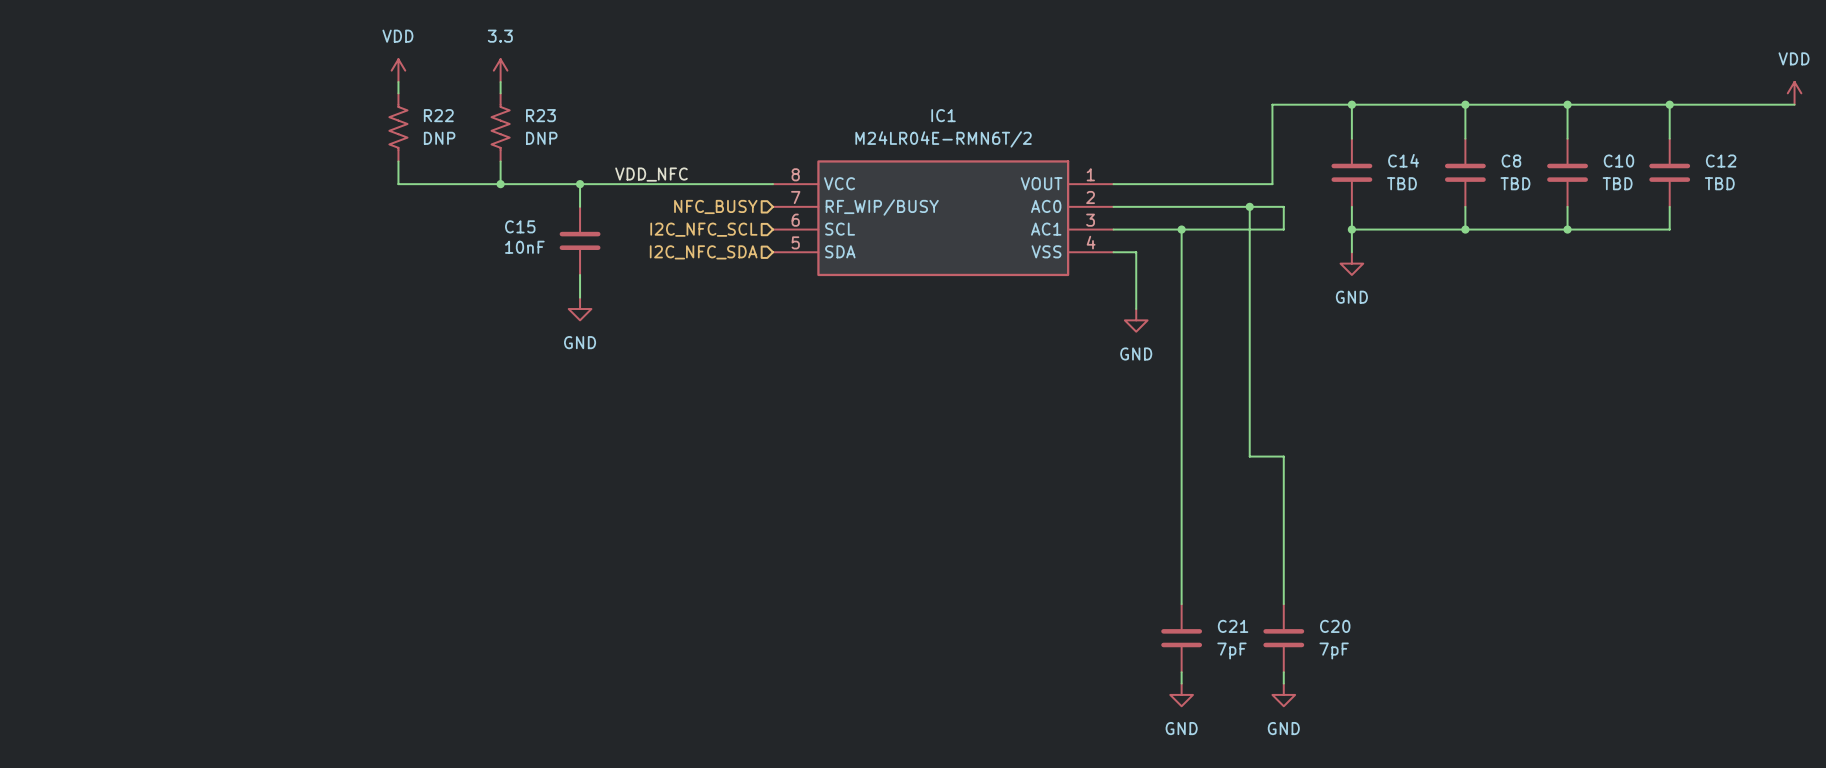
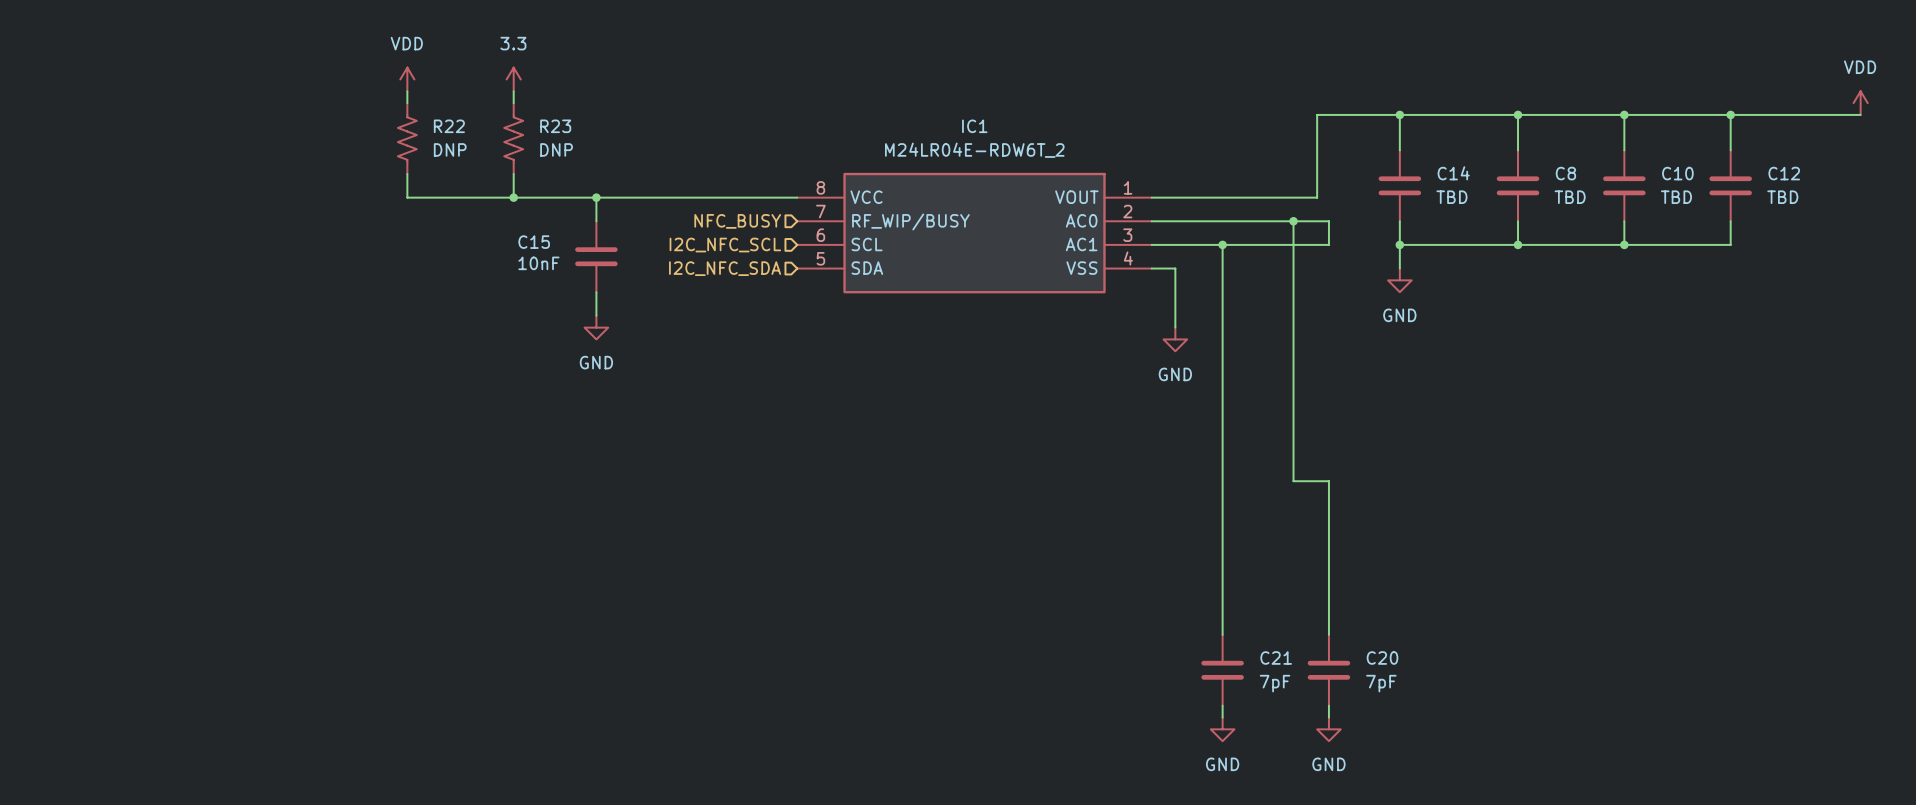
IC1 value: M24LR04E-RMN6T/2 (943, 139) -> M24LR04E-RDW6T_2 (974, 150)
label: VDD_NFC (651, 174) -> none

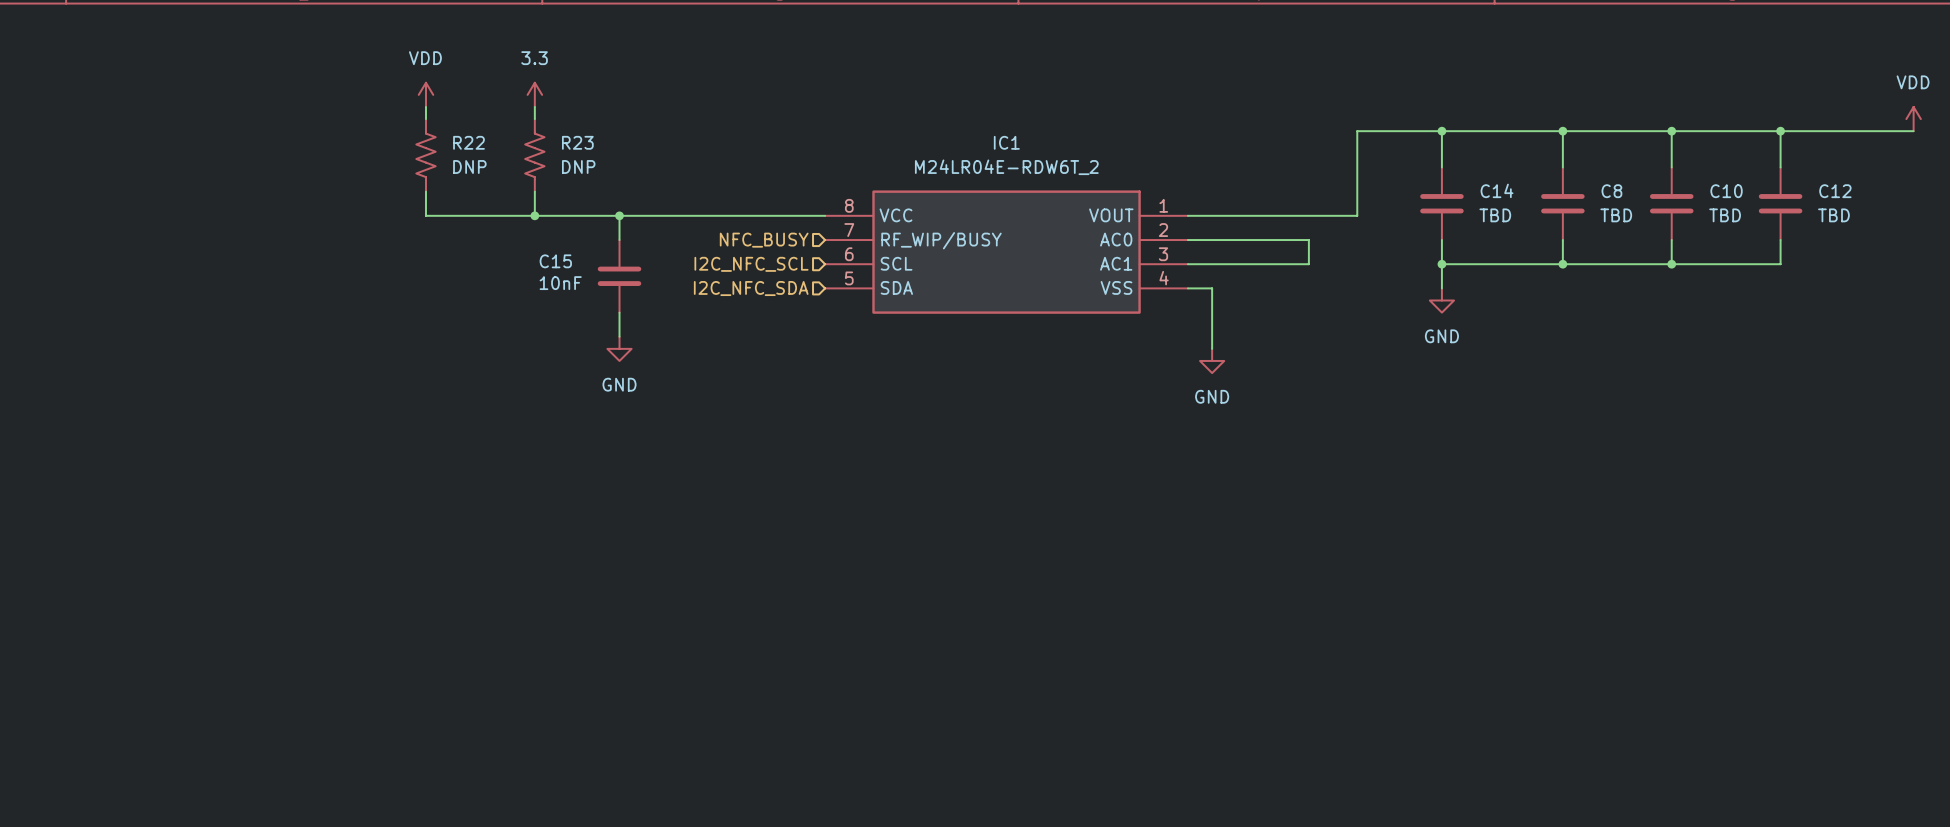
wire: (1269, 221) (1328, 221) (1328, 244) (1269, 244) -> (1308, 240) (1308, 264)
wire: (1293, 221) (1293, 481) (1328, 481) (1328, 634) -> none
junction: (1293, 221) -> none
wire: (1222, 244) (1222, 634) -> none
junction: (1222, 244) -> none
C21: 7pF (1222, 670) -> none
C20: 7pF (1328, 670) -> none
wire: (1222, 705) (1222, 717) -> none
wire: (1328, 705) (1328, 717) -> none
power symbol: GND (1222, 729) -> none
power symbol: GND (1328, 729) -> none

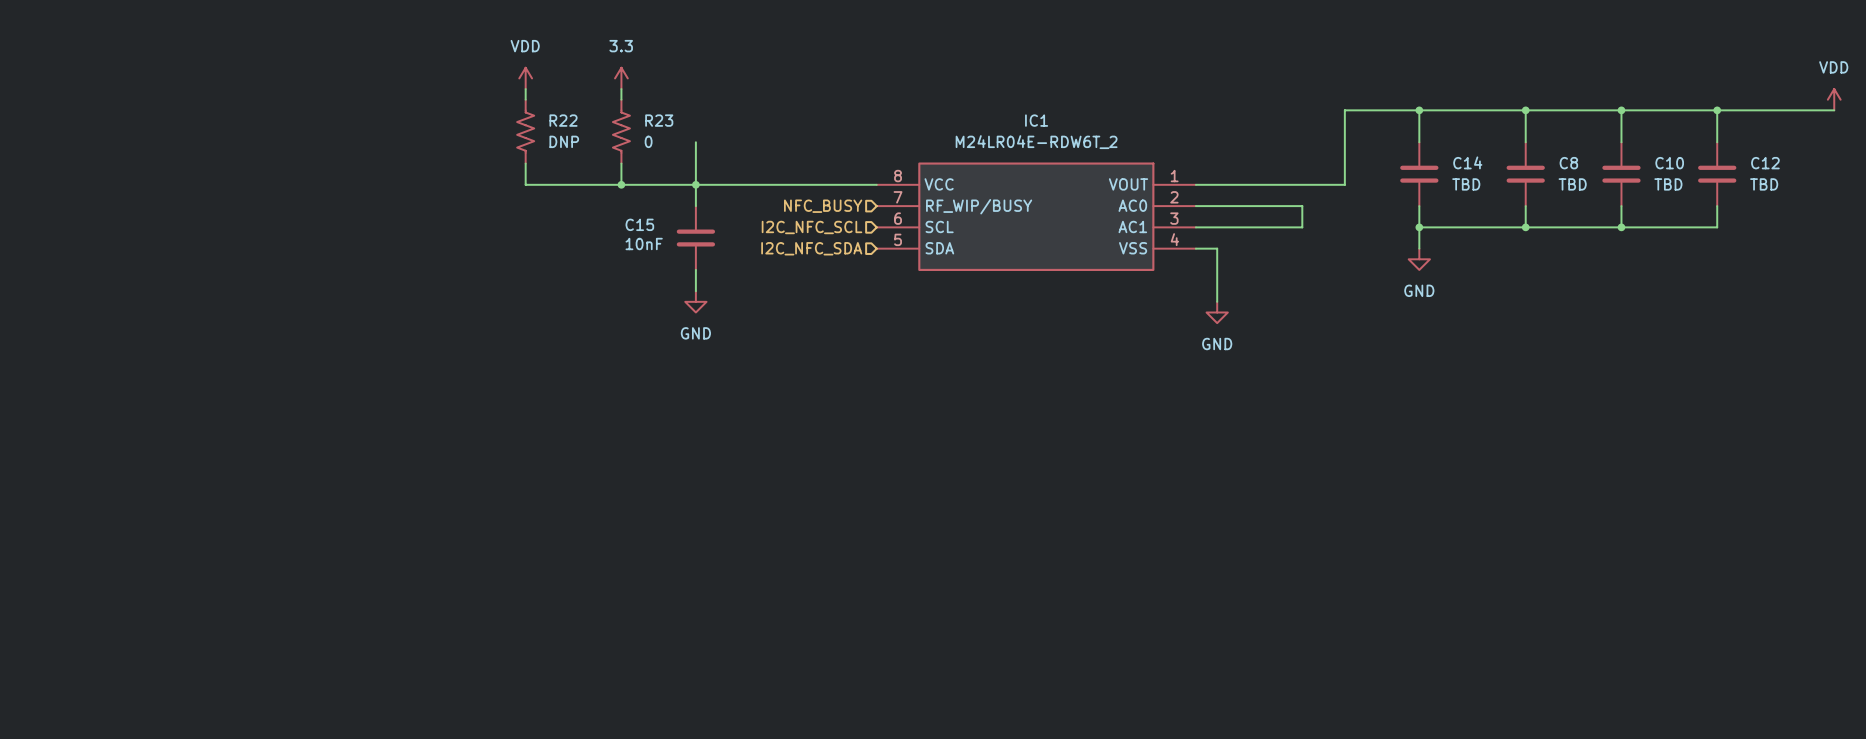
R23 value: DNP (578, 167) -> 0 (648, 141)
wire: none -> (695, 142) (695, 184)

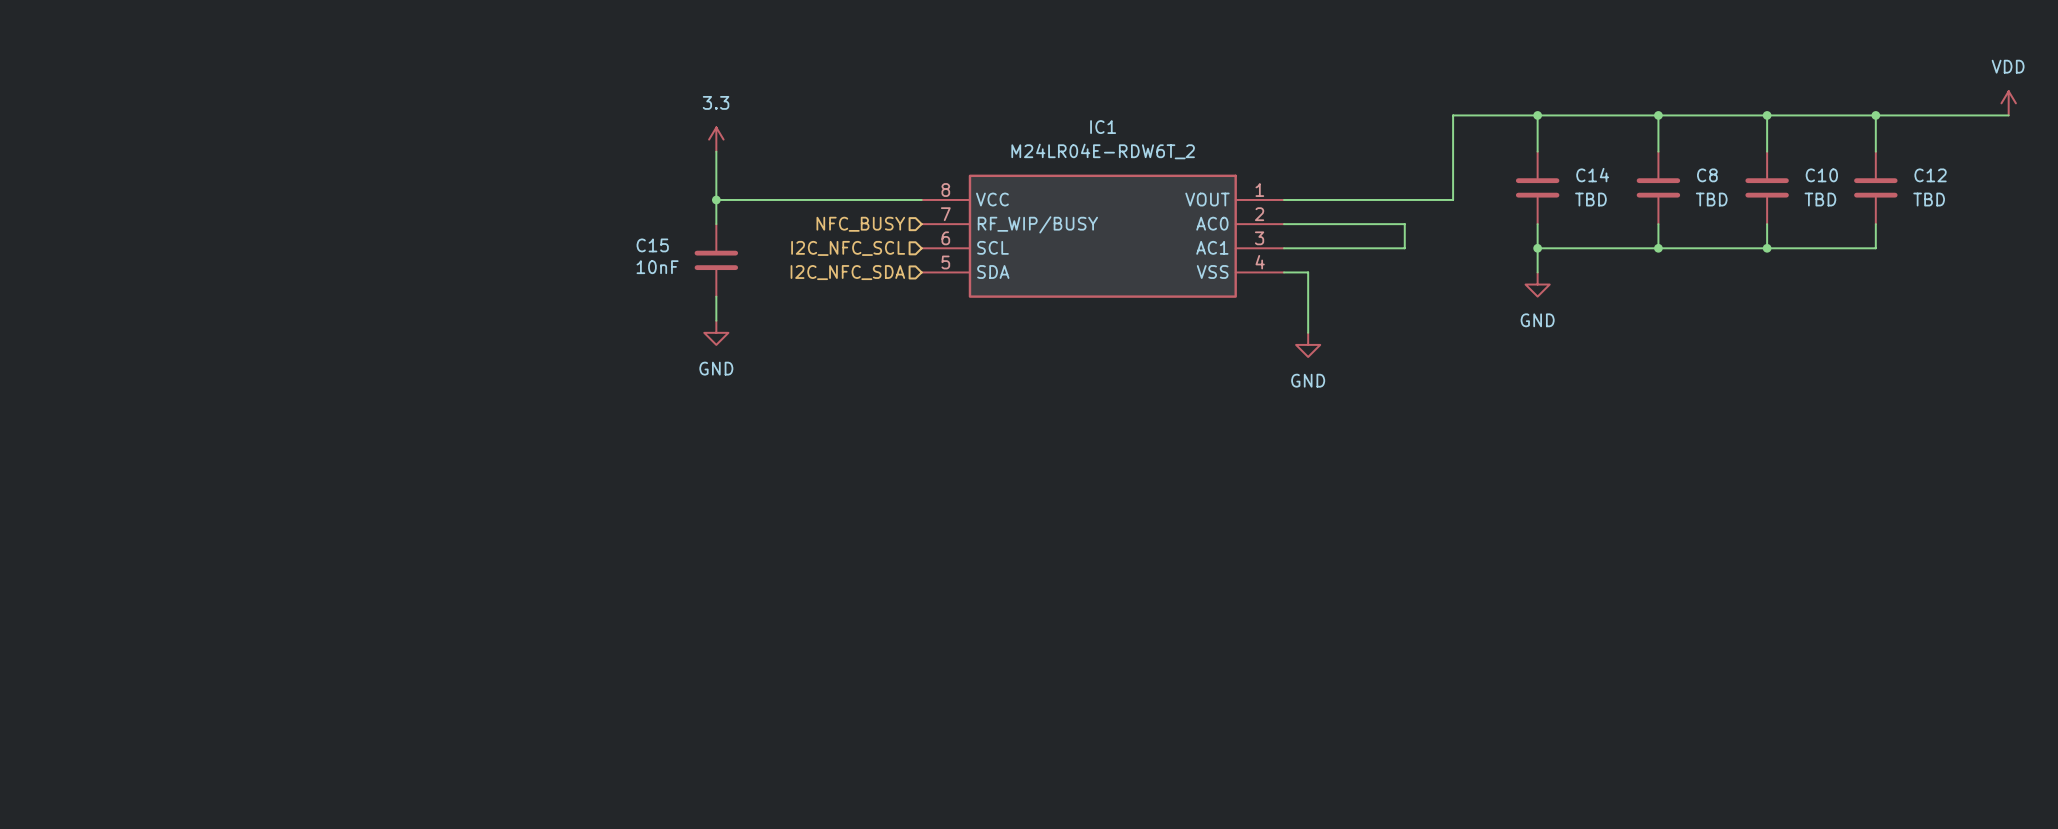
power symbol: VDD (525, 78) -> none
power symbol position: 3.3 (621, 78) -> 3.3 (716, 139)
wire: (525, 89) (525, 99) -> none
wire: (621, 89) (621, 99) -> none
R22: DNP (525, 131) -> none
R23: 0 (621, 131) -> none
wire: (525, 163) (525, 184) (695, 184) -> none
wire: (621, 163) (621, 184) -> none
junction: (621, 184) -> none

